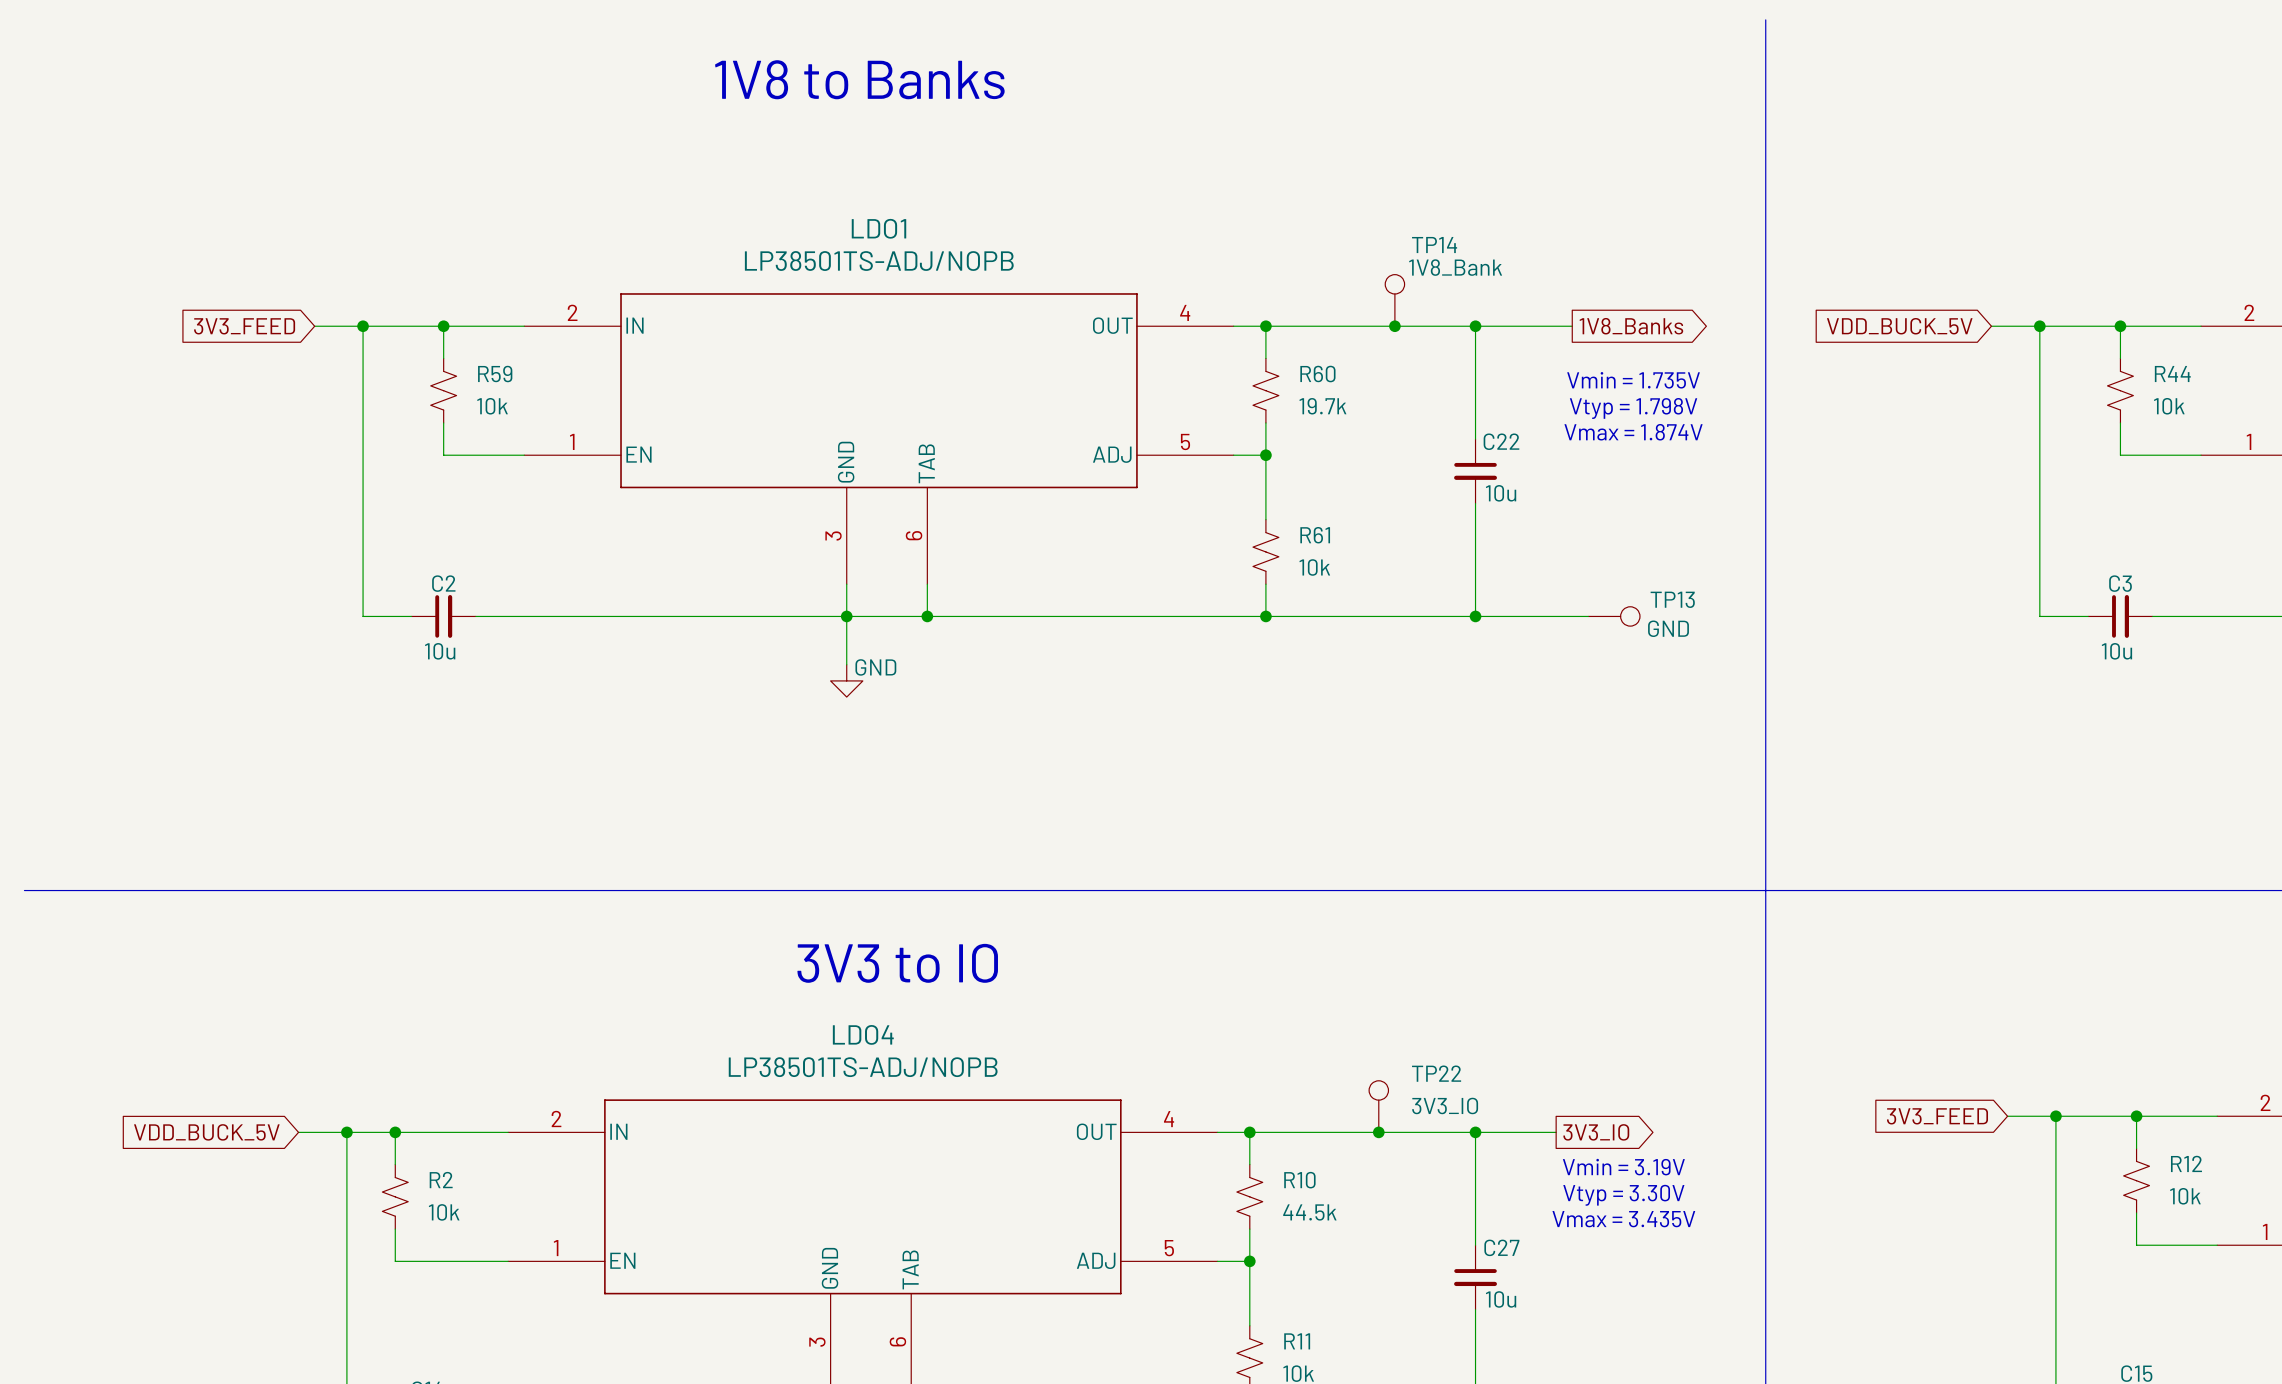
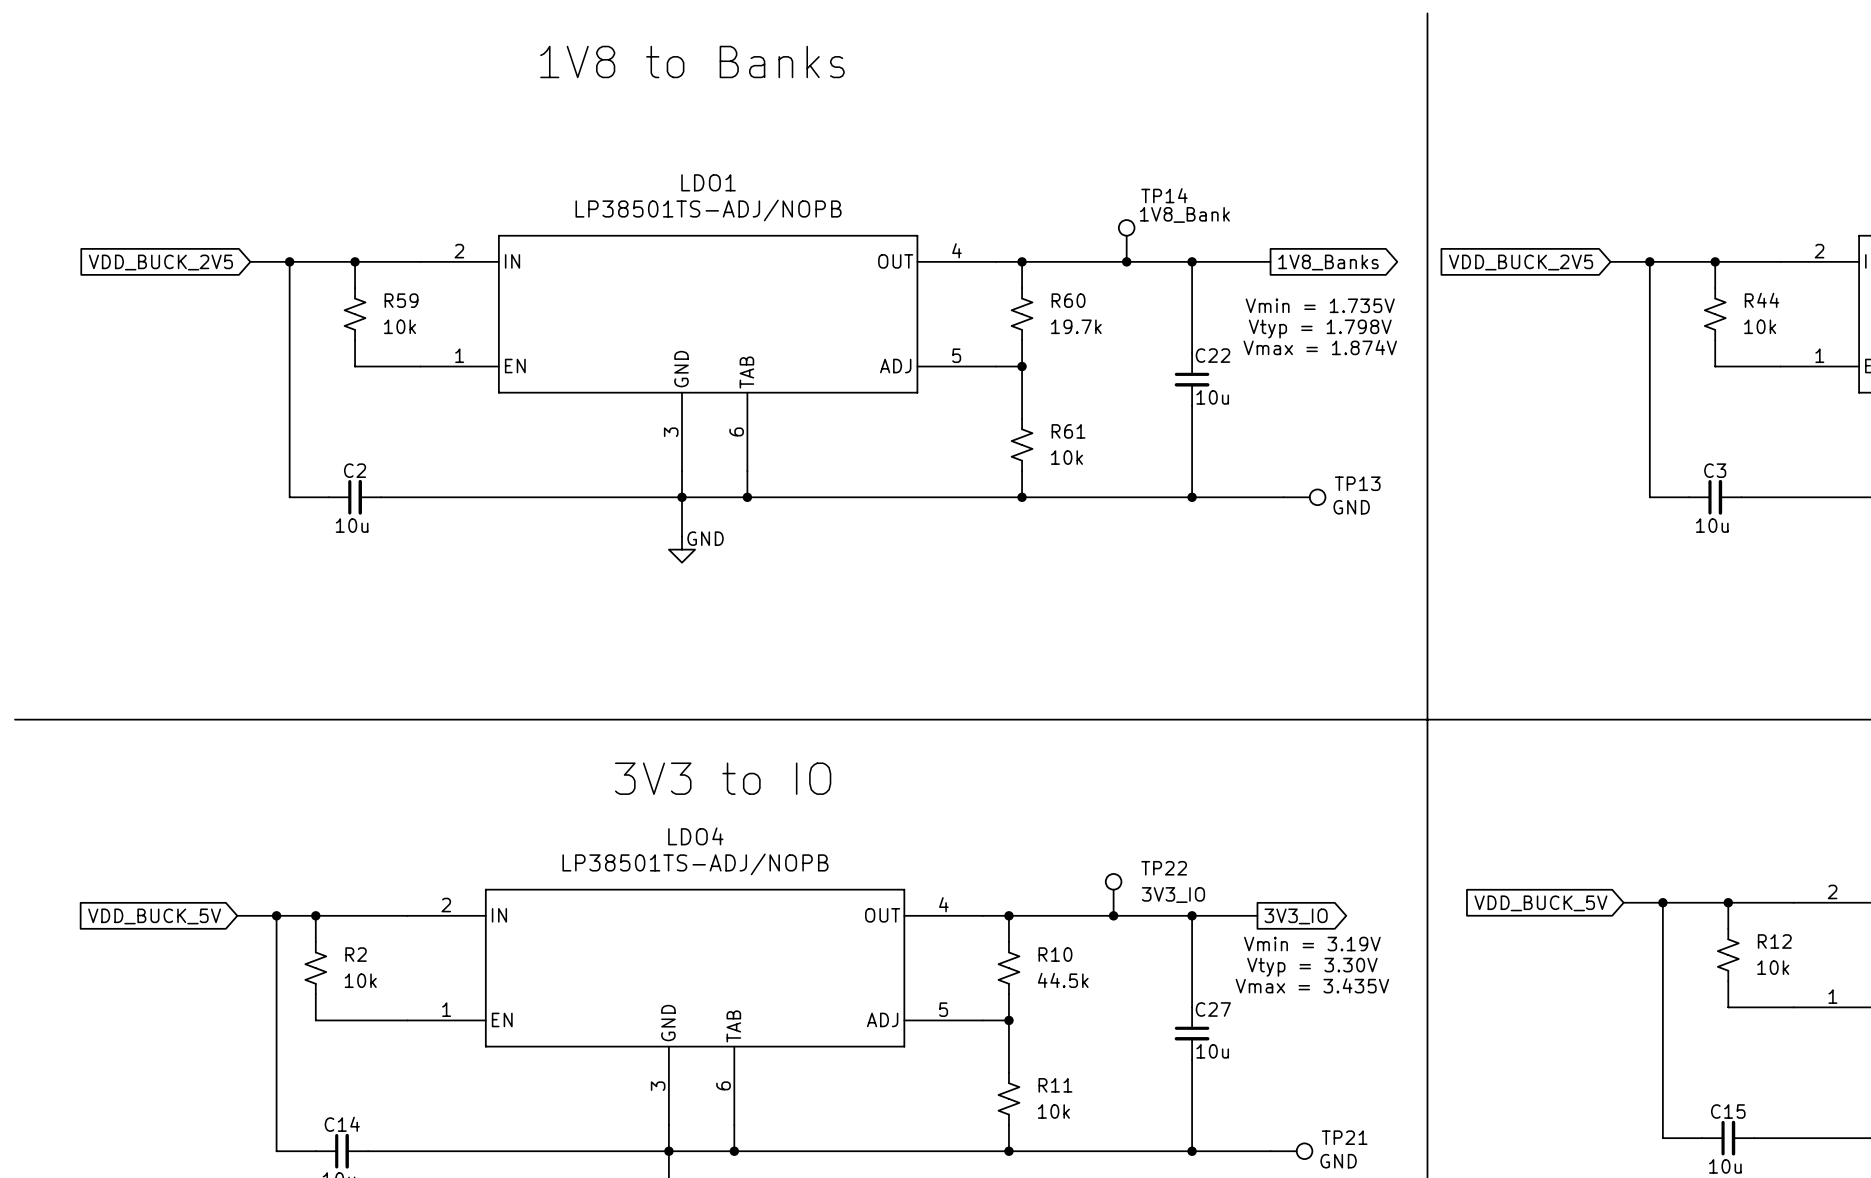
global label: 3V3_FEED (244, 326) -> VDD_BUCK_2V5 (160, 262)
global label: VDD_BUCK_5V (1899, 326) -> VDD_BUCK_2V5 (1521, 262)
global label: 3V3_FEED (1937, 1116) -> VDD_BUCK_5V (1540, 903)

